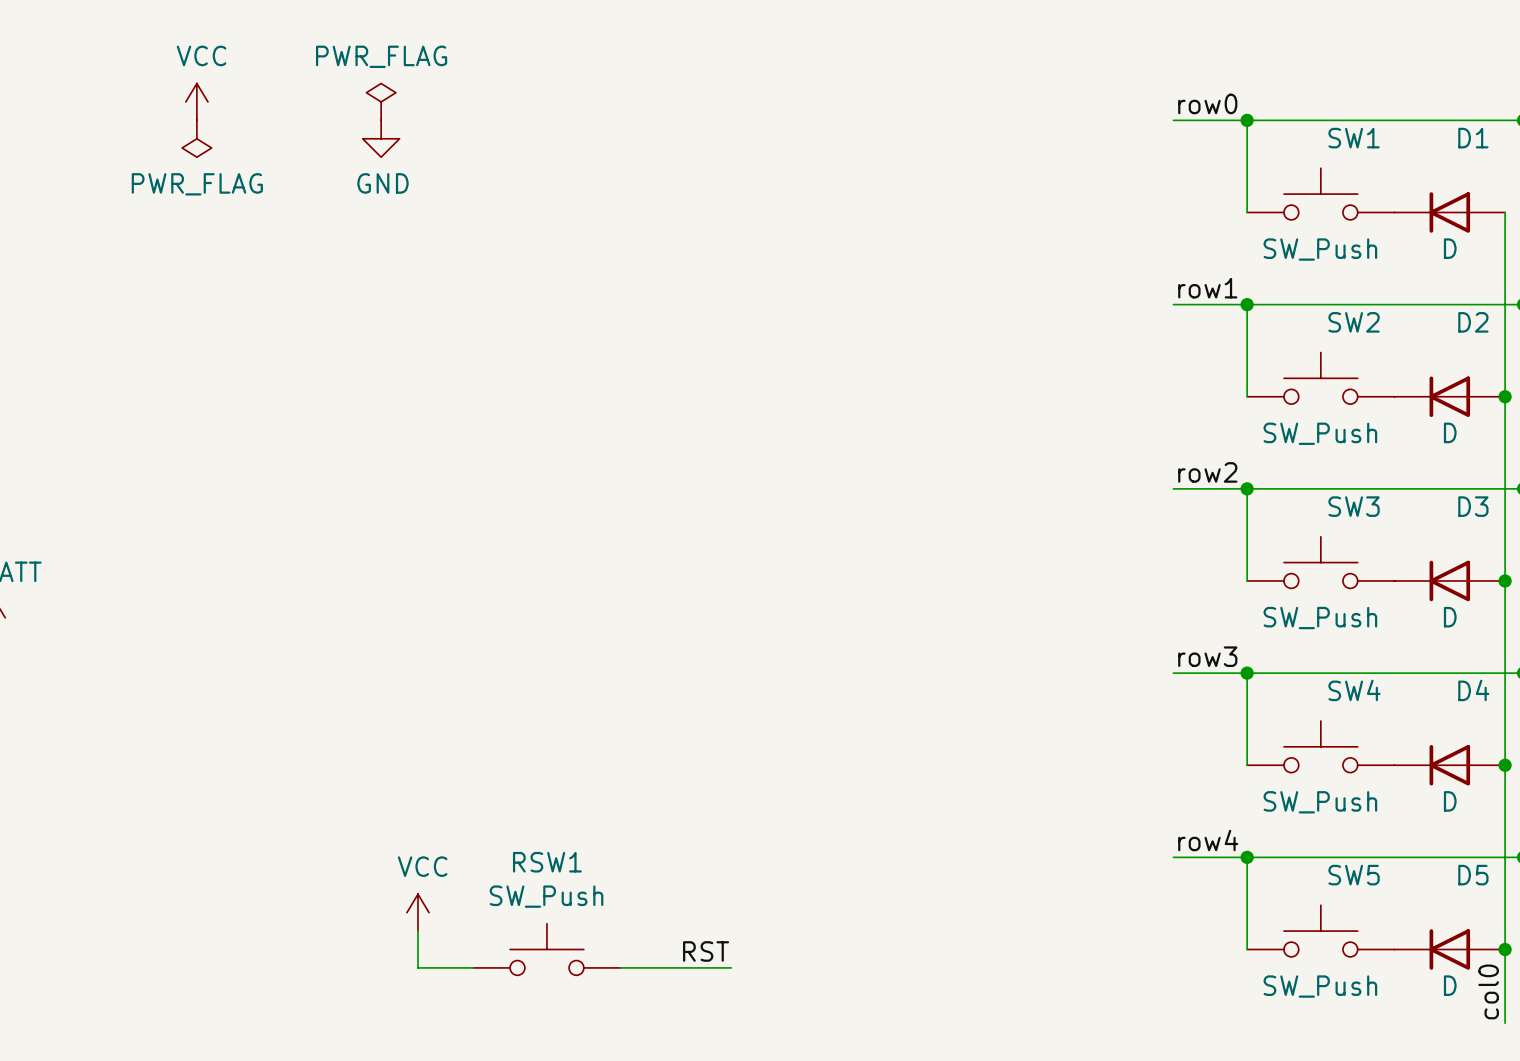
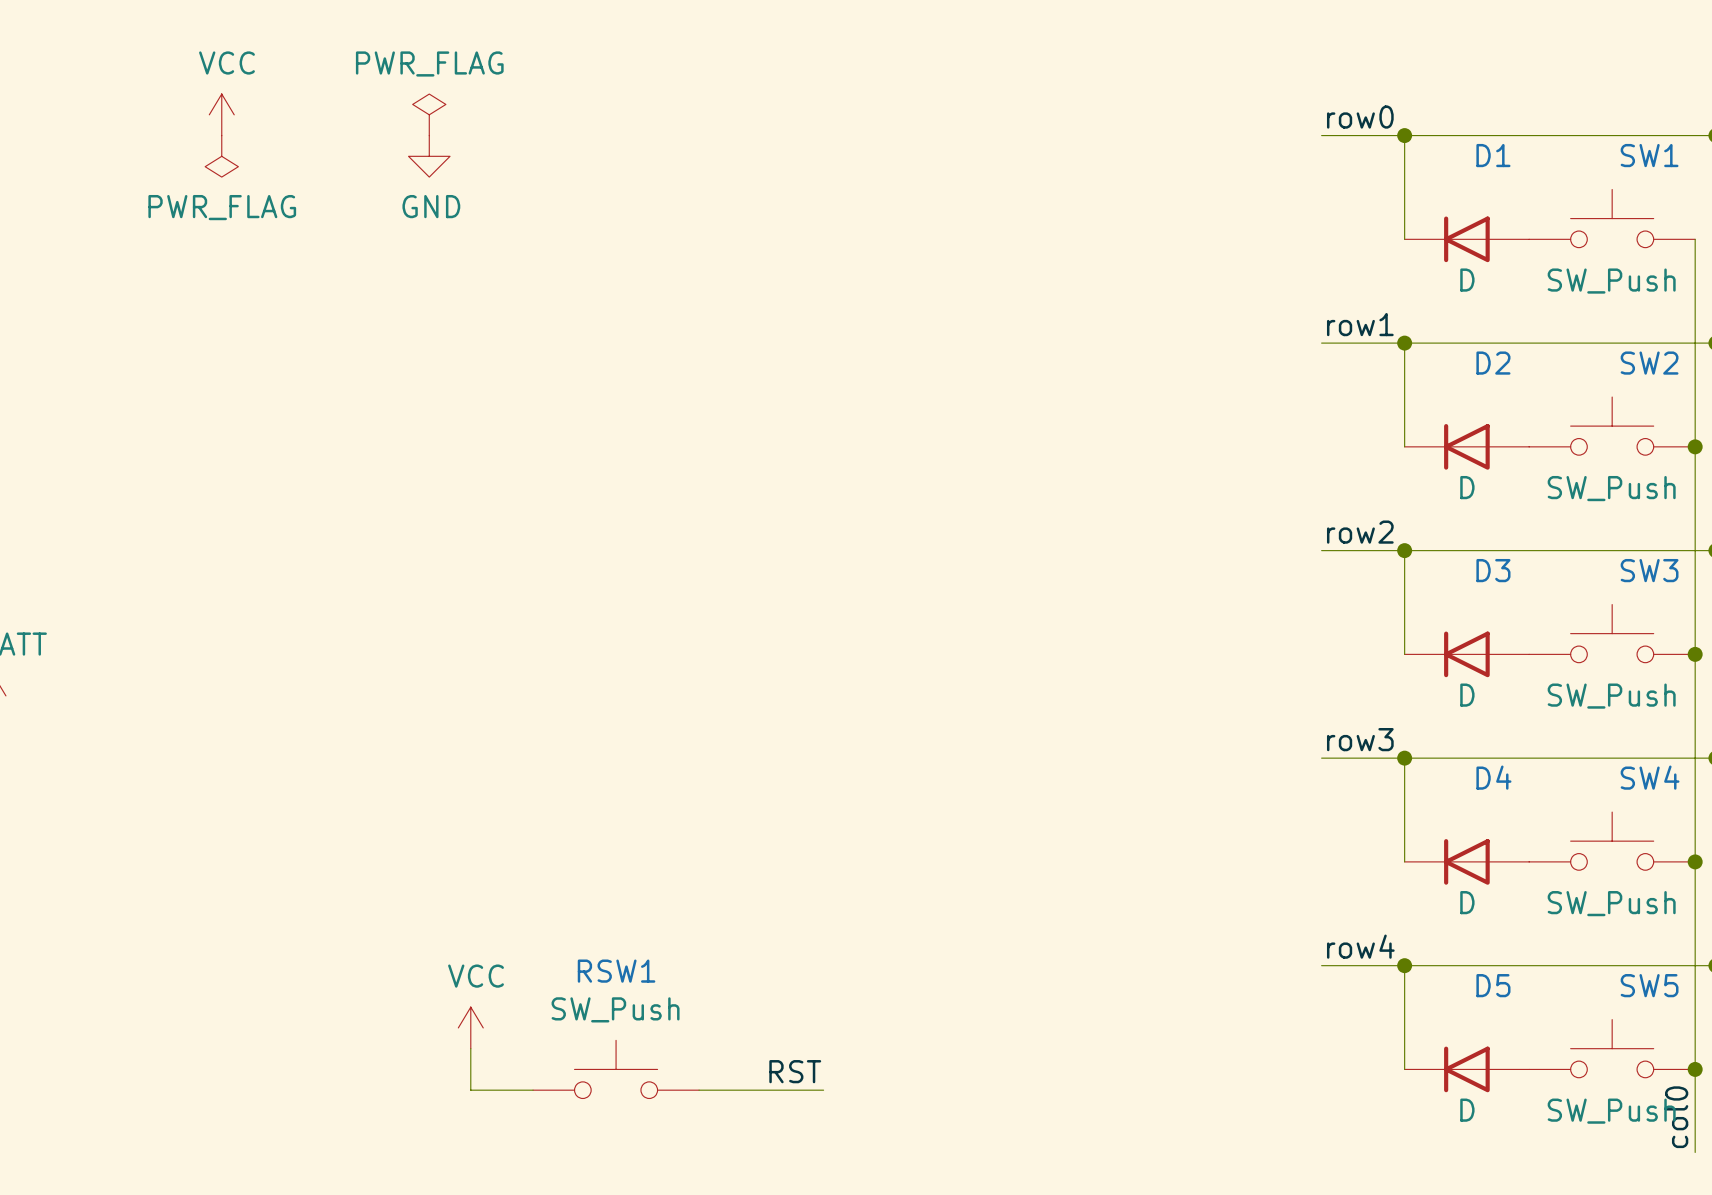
SW1 position: (1320, 194) -> (1612, 218)
D1 position: (1449, 212) -> (1466, 239)
SW2 position: (1320, 378) -> (1612, 426)
D2 position: (1449, 396) -> (1466, 446)
SW3 position: (1320, 562) -> (1612, 633)
D3 position: (1449, 581) -> (1466, 654)
SW4 position: (1320, 746) -> (1612, 841)
D4 position: (1449, 765) -> (1466, 861)
SW5 position: (1320, 931) -> (1612, 1048)
D5 position: (1449, 949) -> (1466, 1069)

